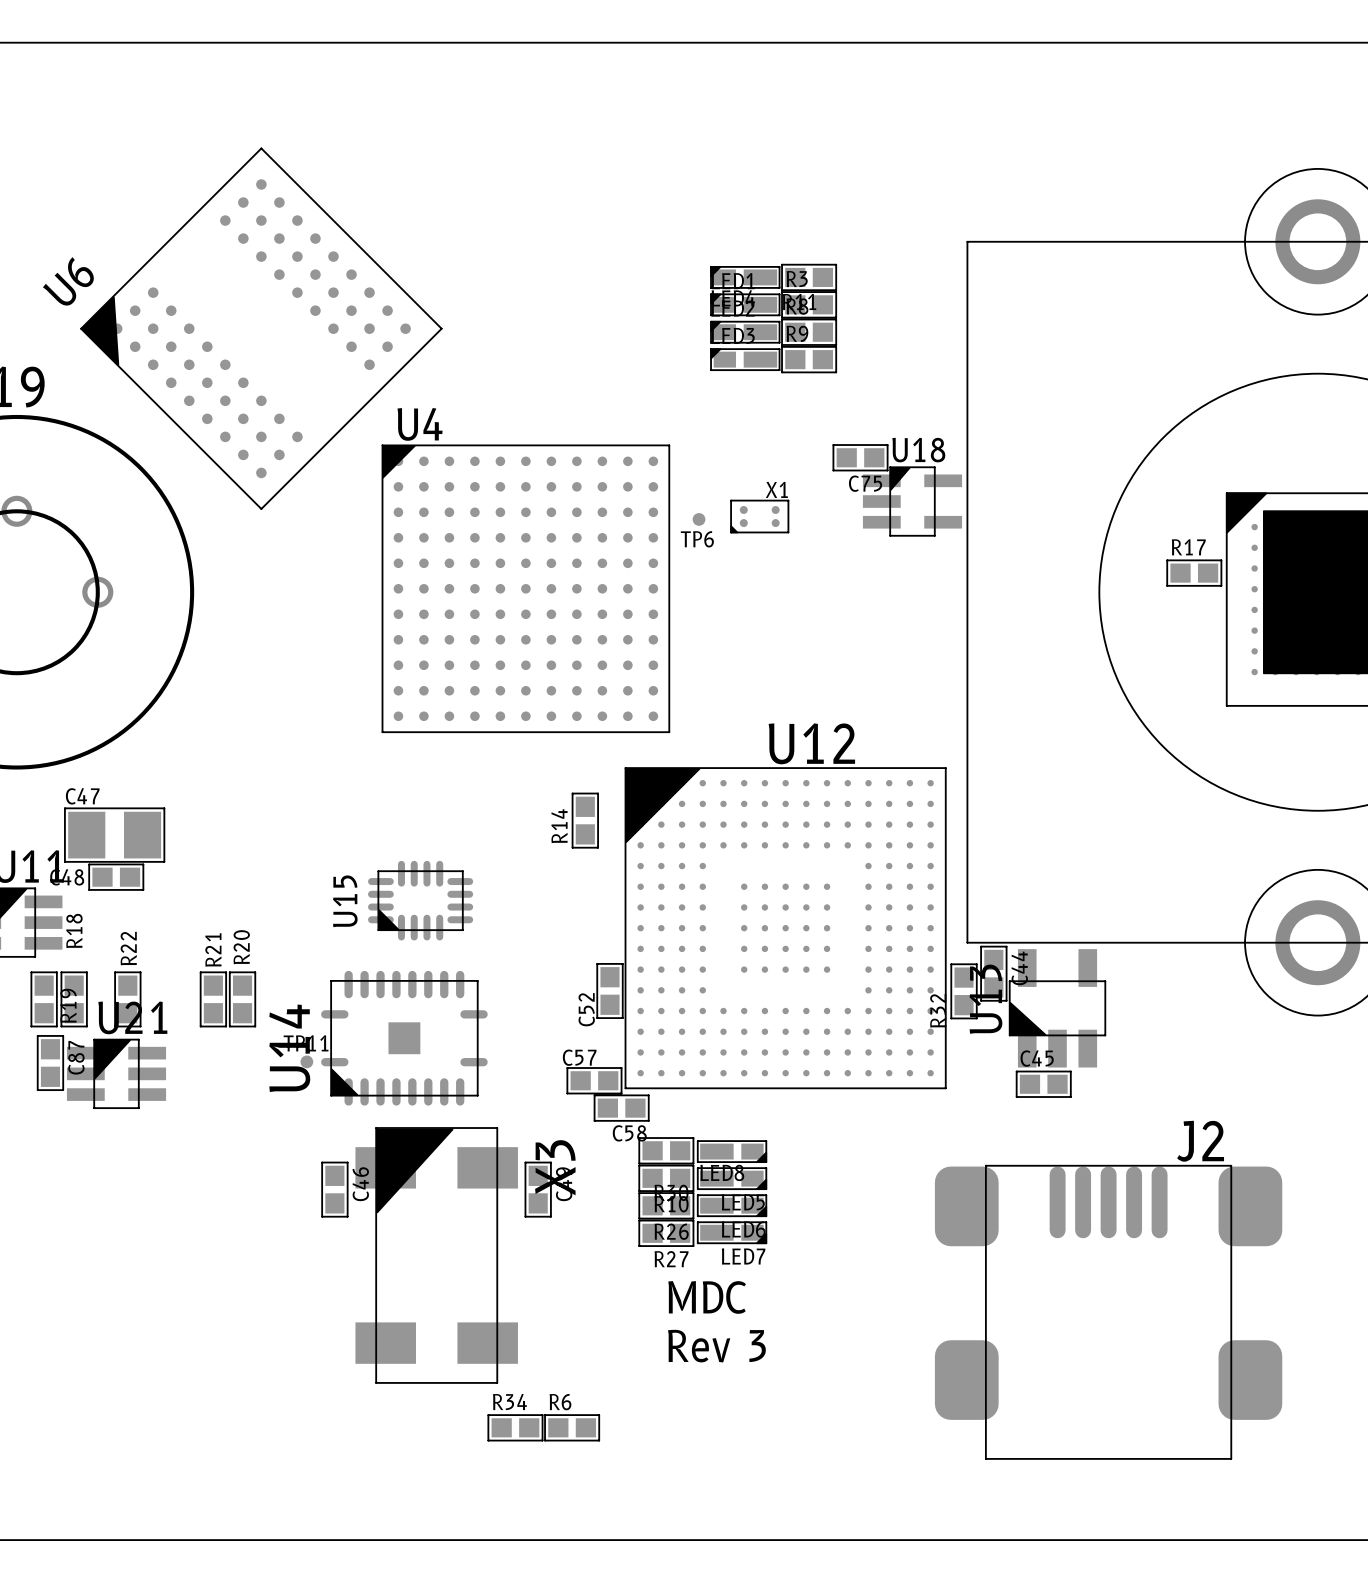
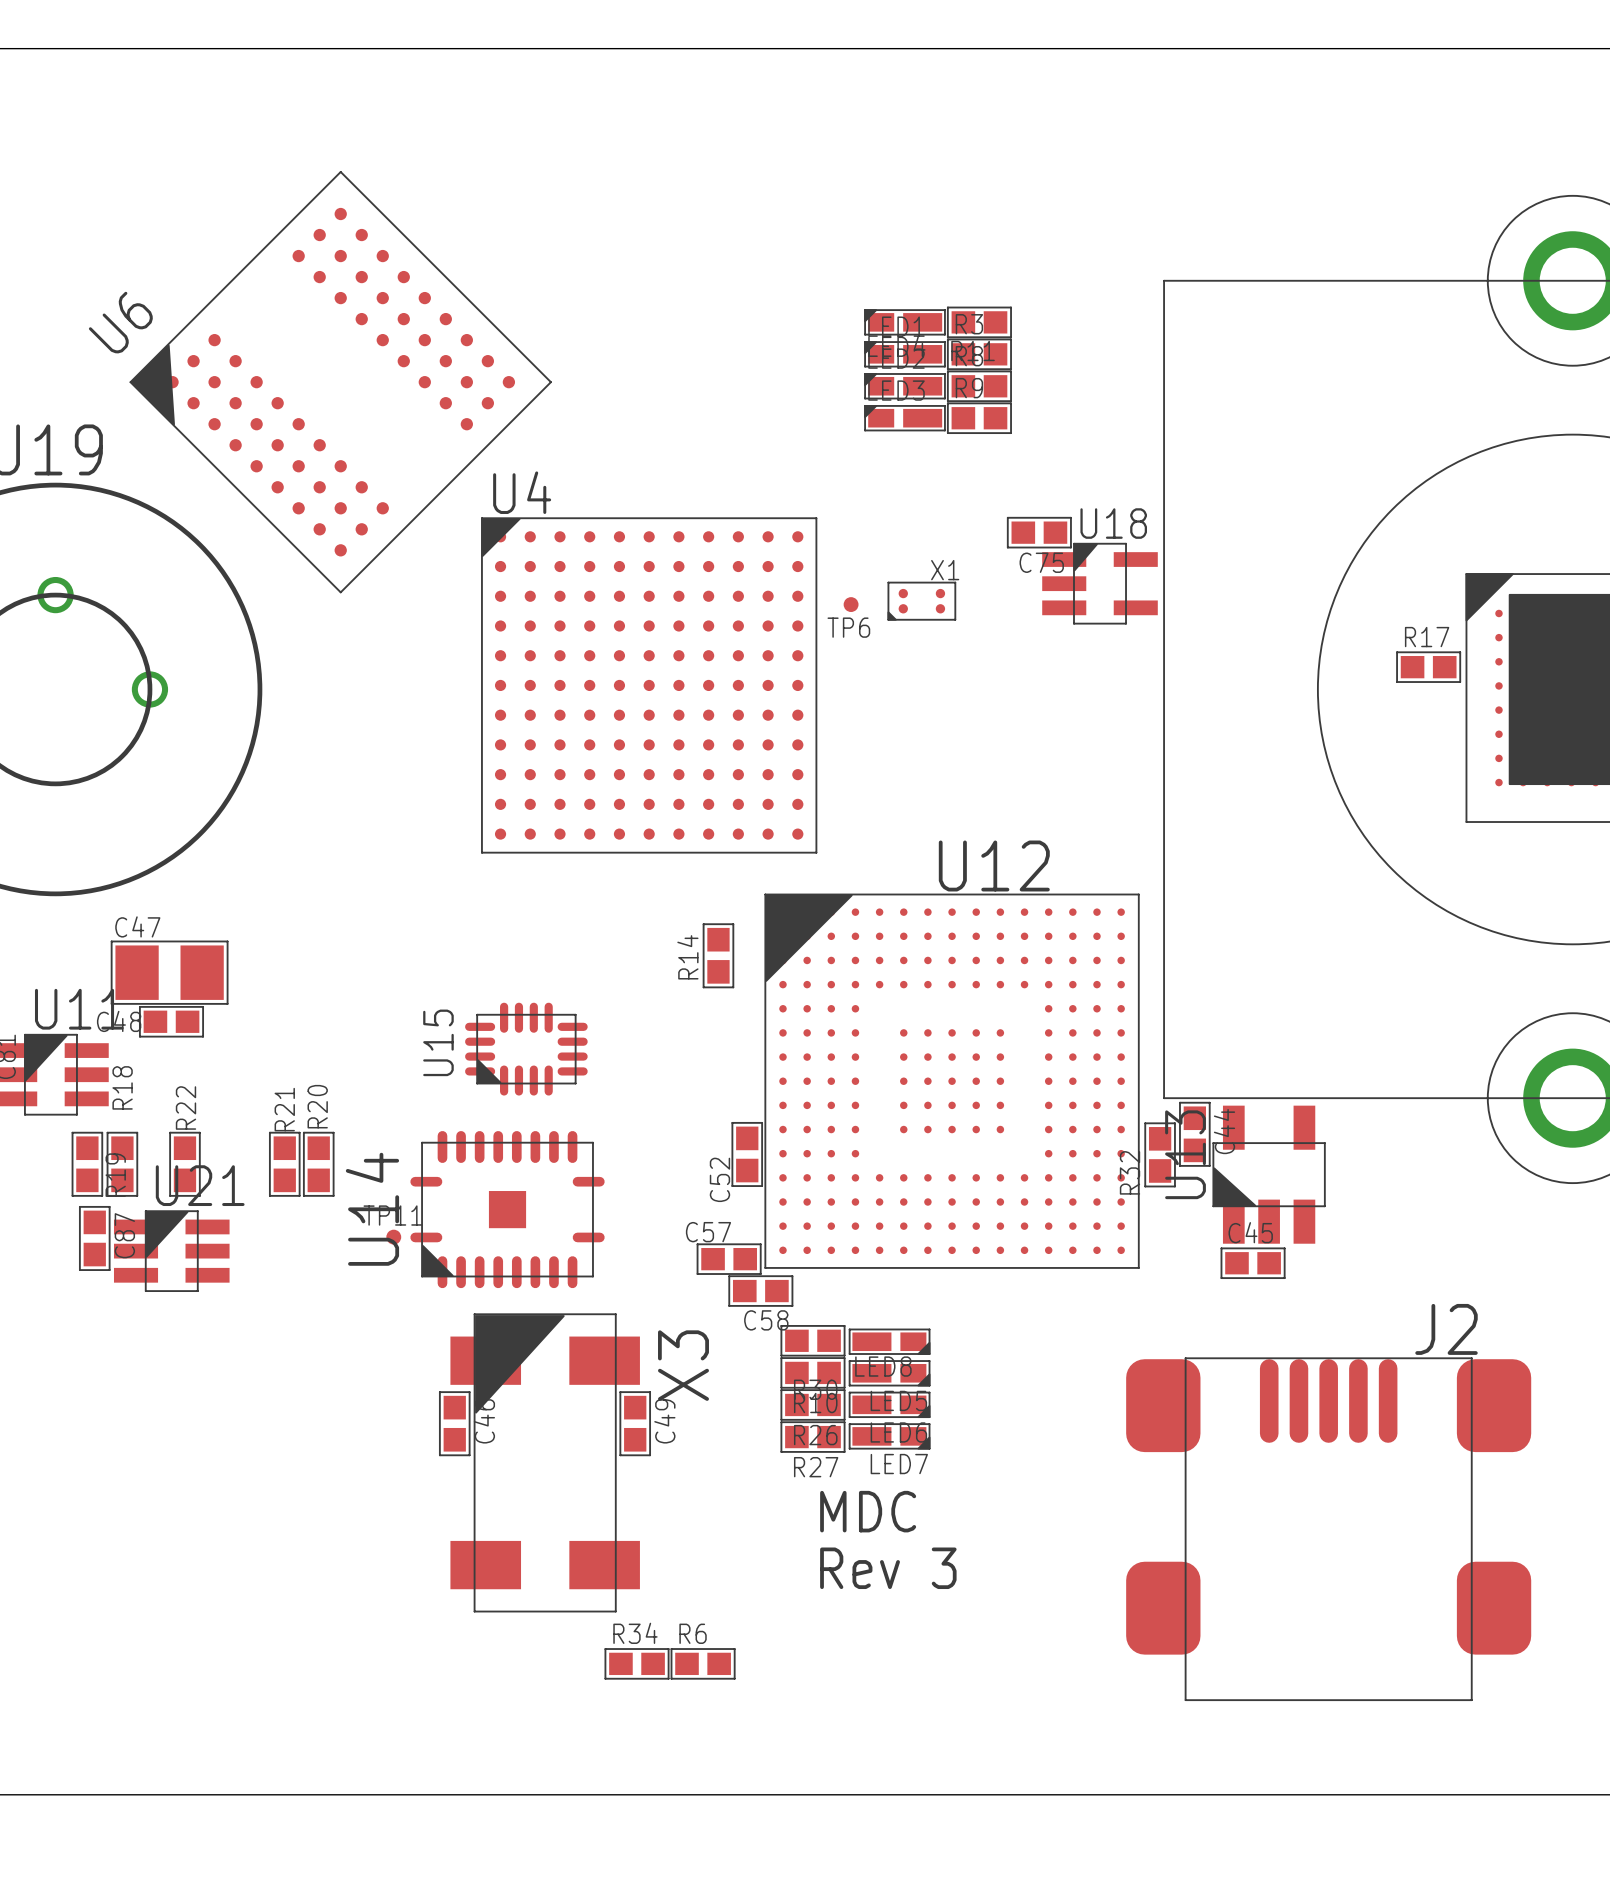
C46 position: (334, 1189) -> (454, 1423)
C49 position: (538, 1189) -> (635, 1423)

